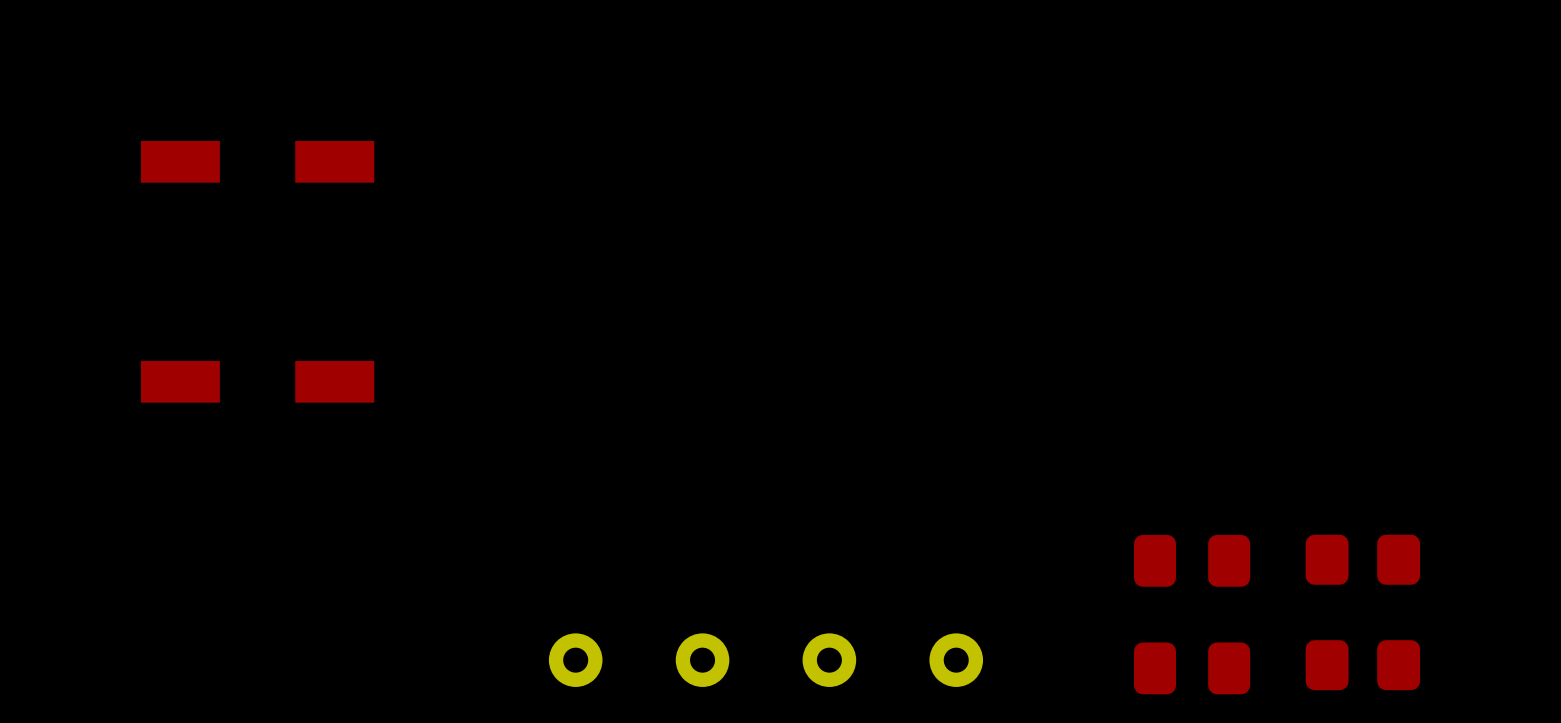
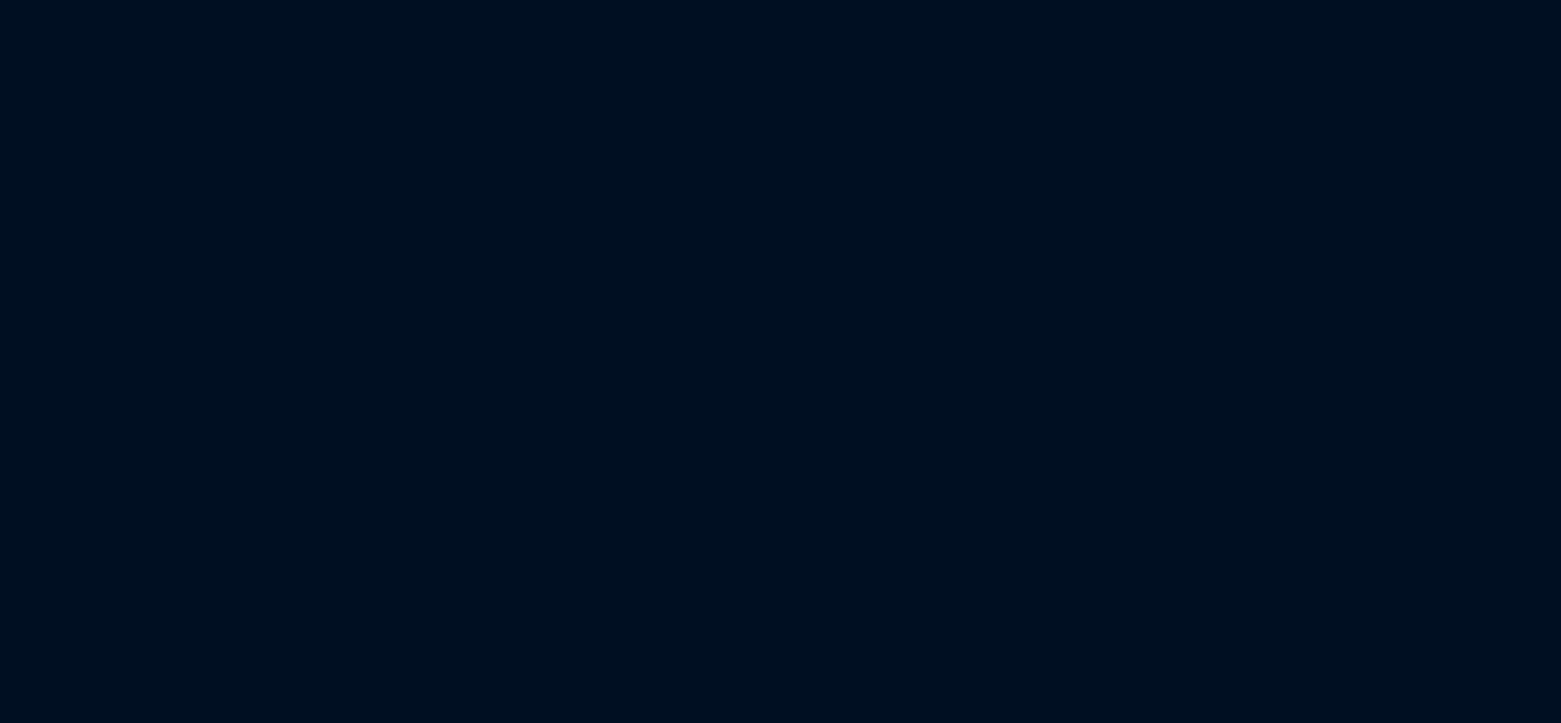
part: (257, 161) -> none
part: (257, 381) -> none
part: (1362, 559) -> none
part: (1192, 560) -> none
part: (575, 660) -> none
part: (702, 660) -> none
part: (829, 660) -> none
part: (956, 660) -> none
part: (1362, 665) -> none
part: (1192, 668) -> none

